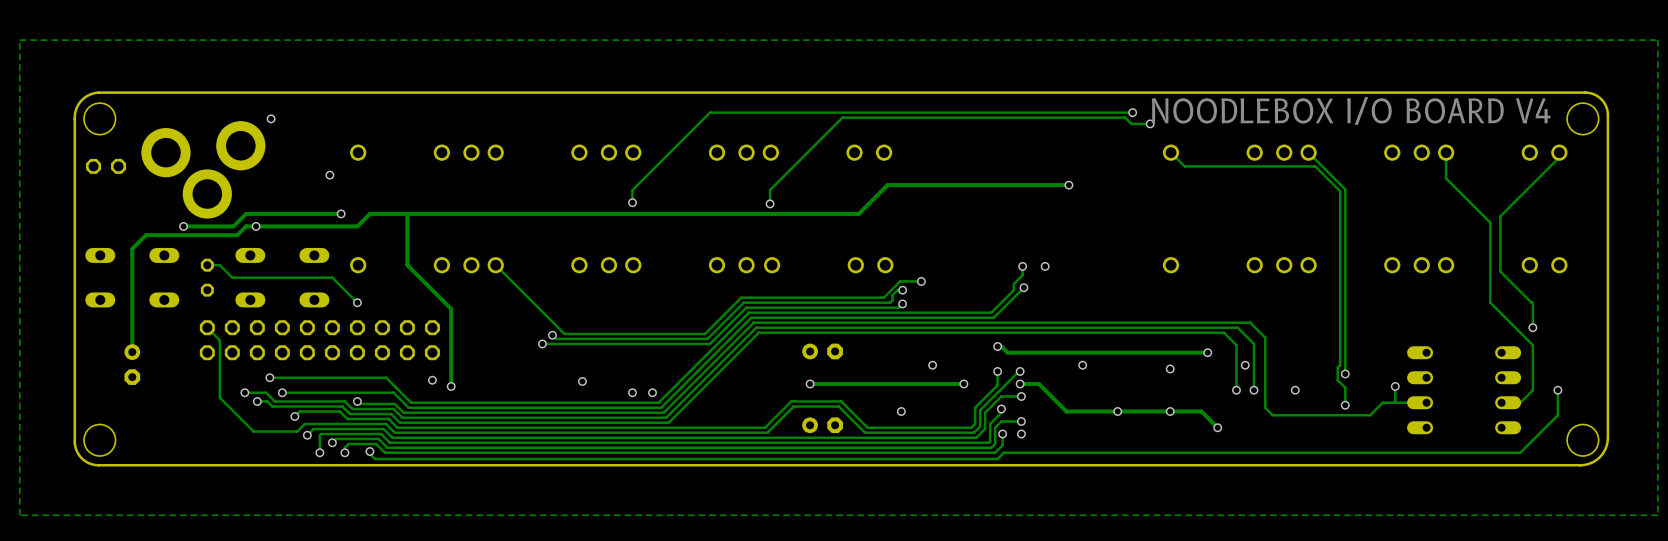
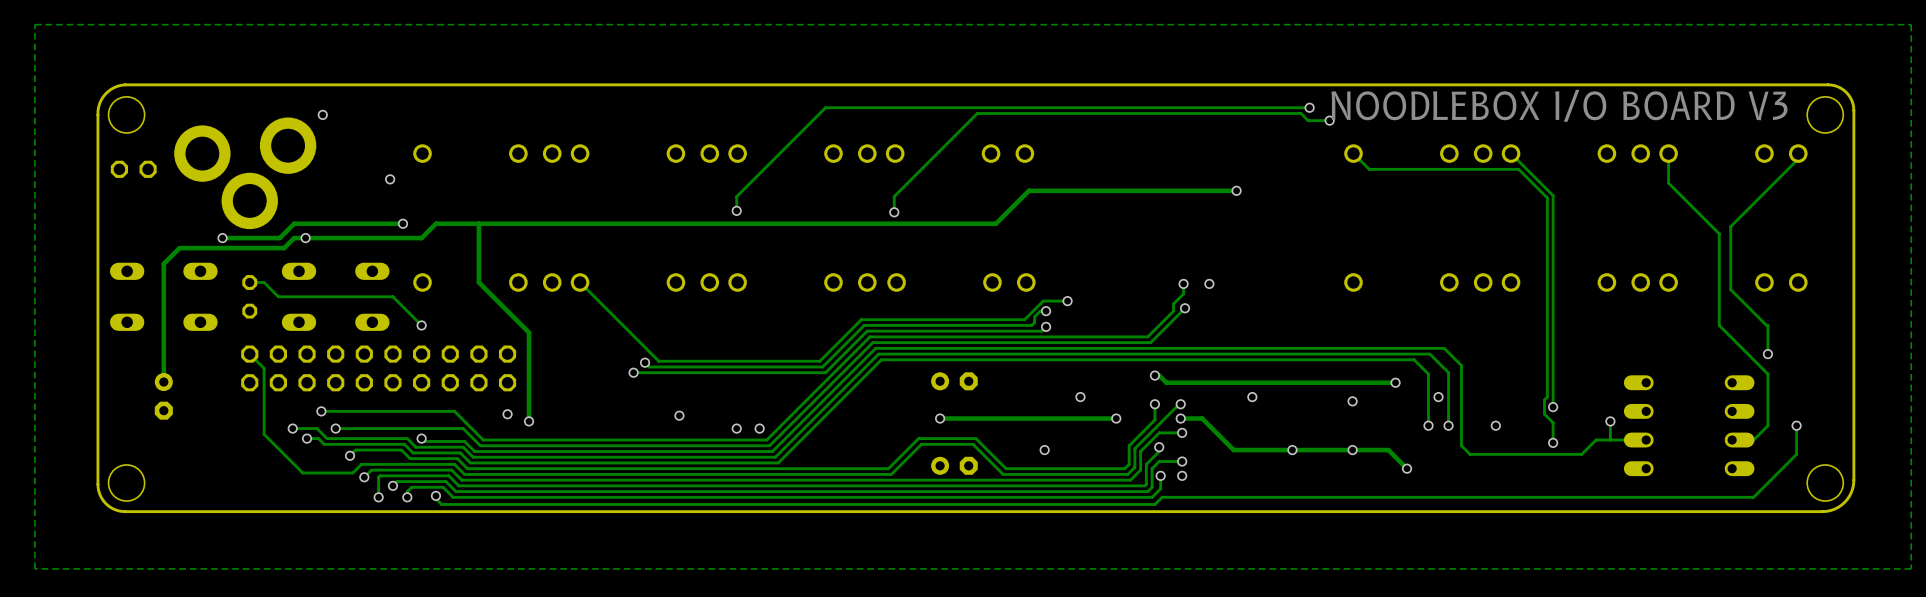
text: NOODLEBOX I/O BOARD V4 (1351, 110) -> NOODLEBOX I/O BOARD V3 (1559, 105)

